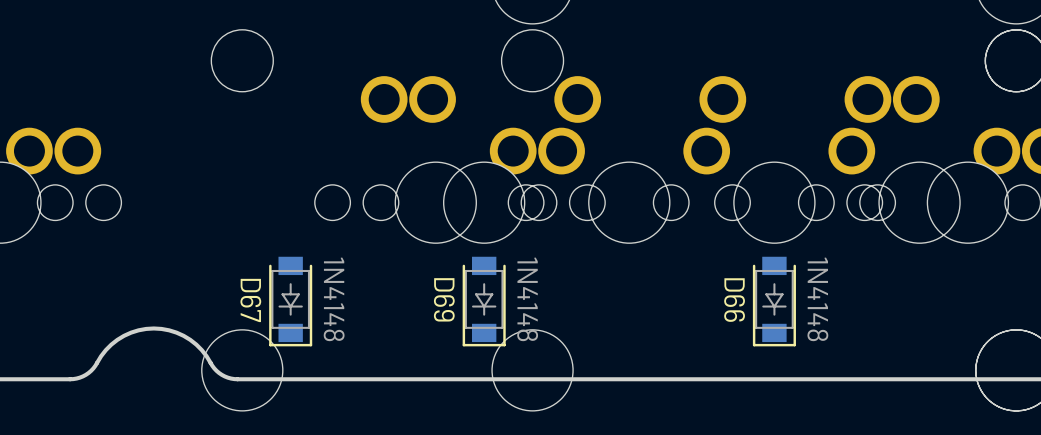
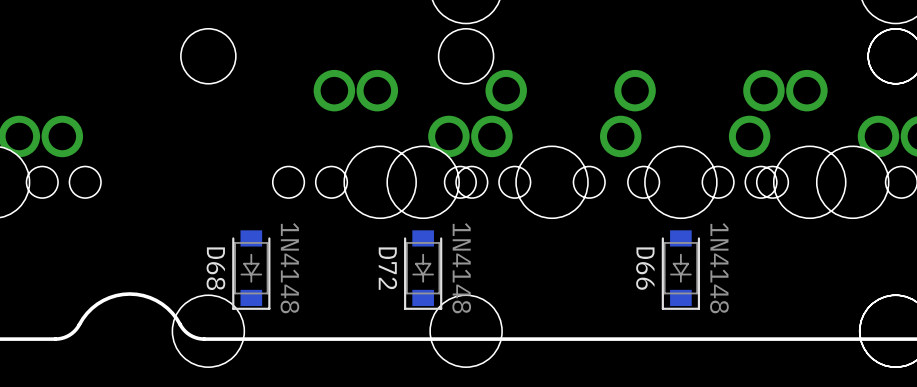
D69 name: D69 (444, 299) -> D72 (387, 268)
D67 name: D67 (250, 300) -> D68 (215, 268)

